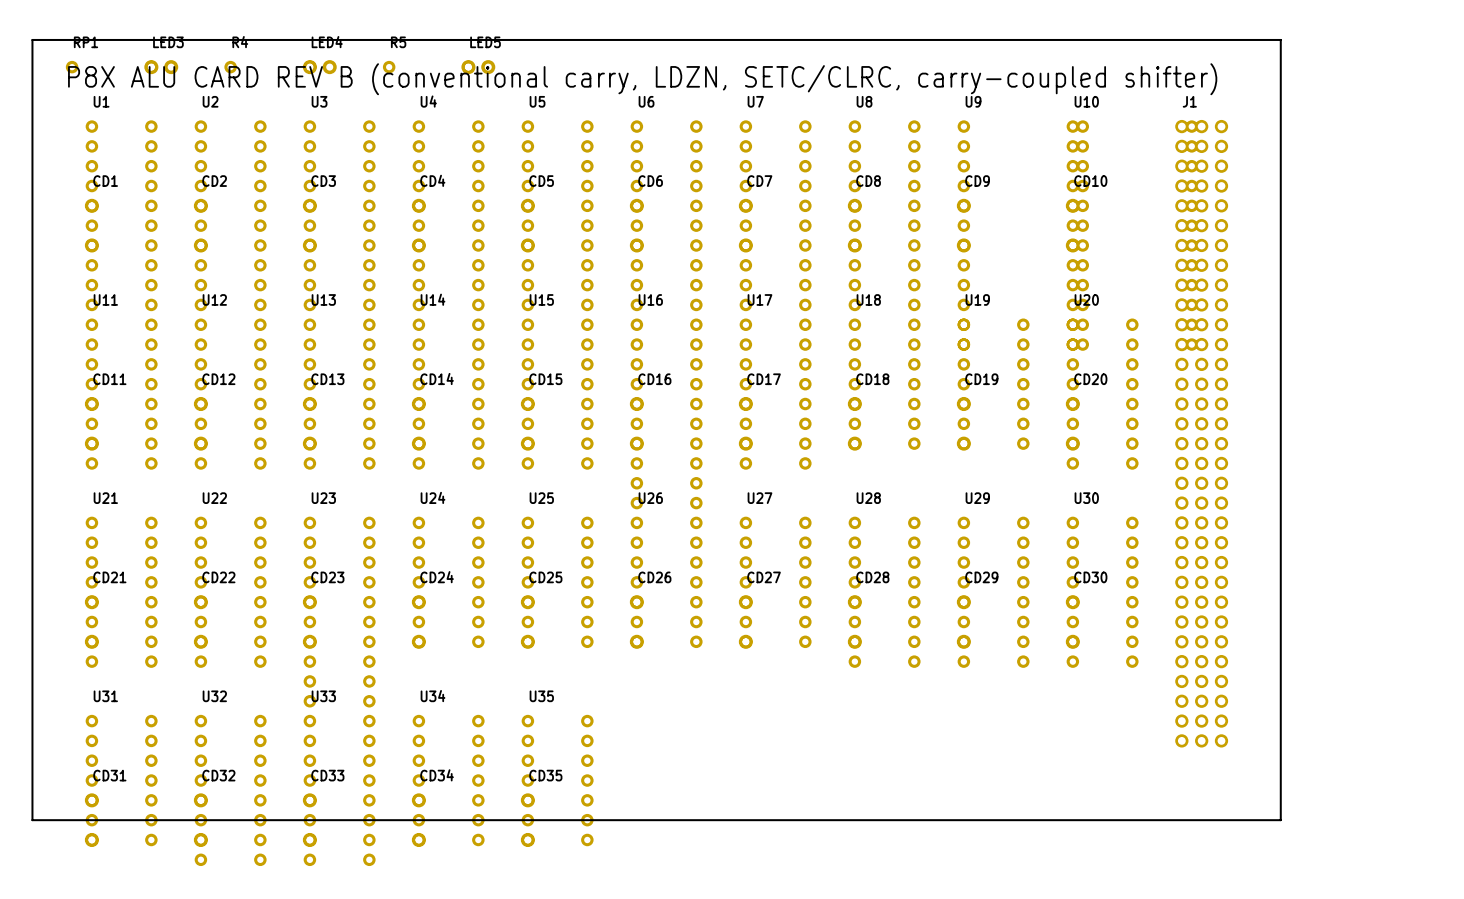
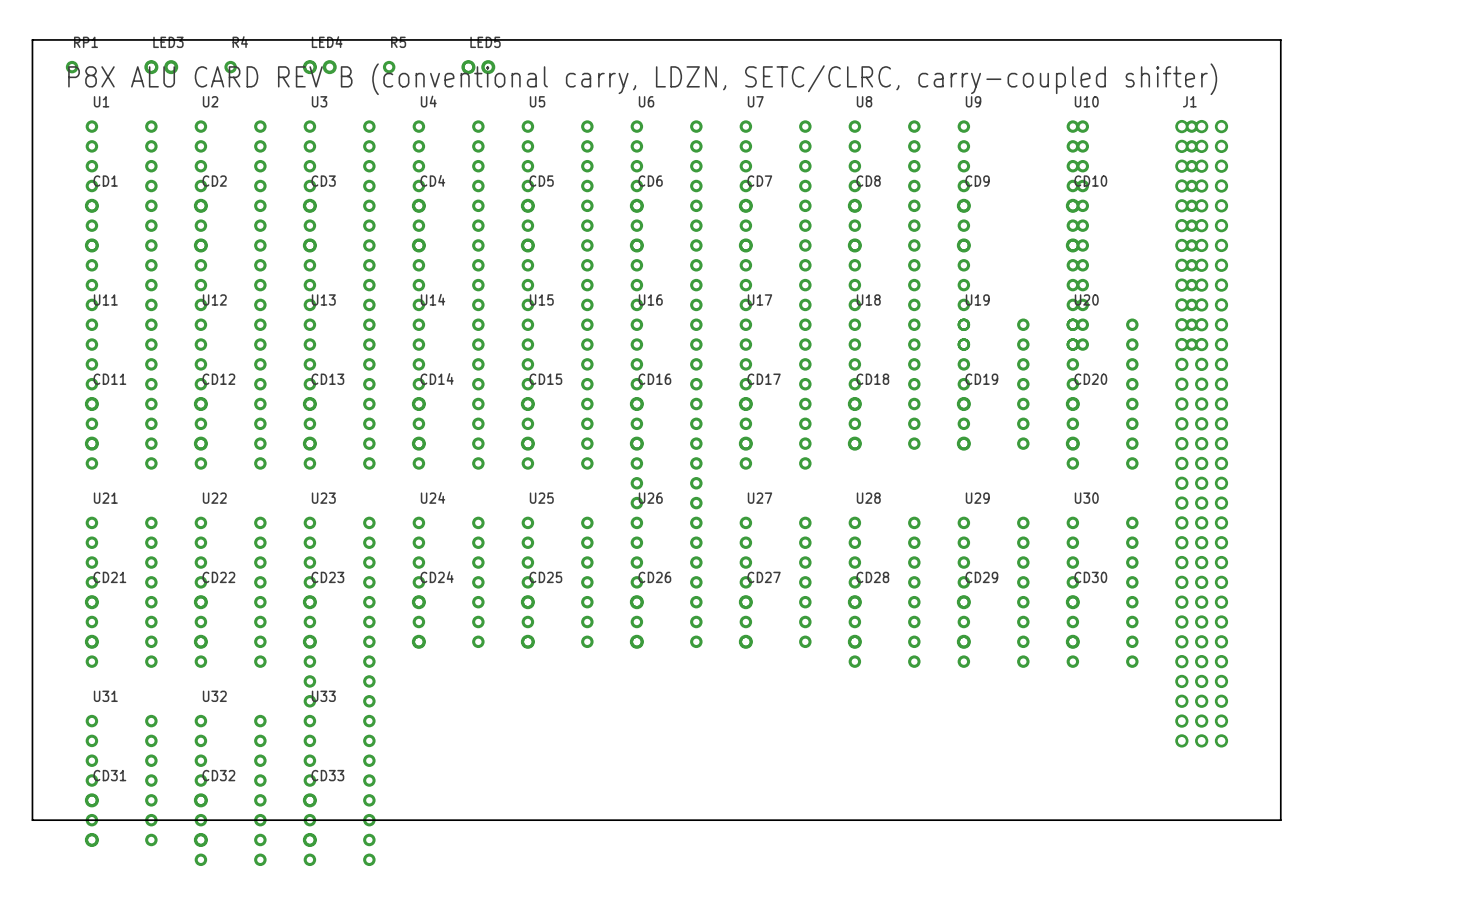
U34: (448, 780) -> none
U35: (557, 780) -> none
CD34: (418, 820) -> none
CD35: (527, 820) -> none

